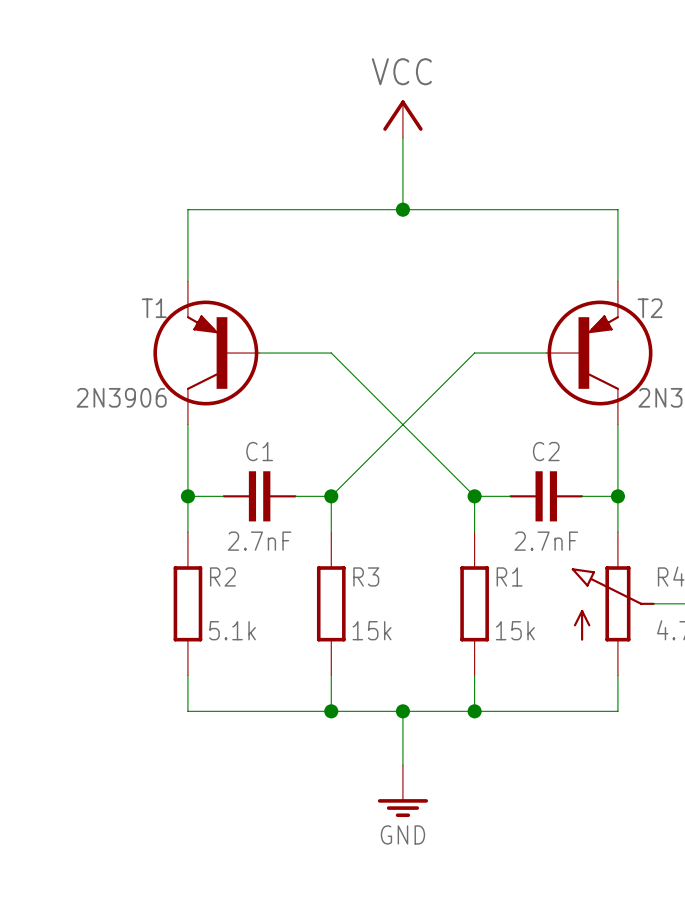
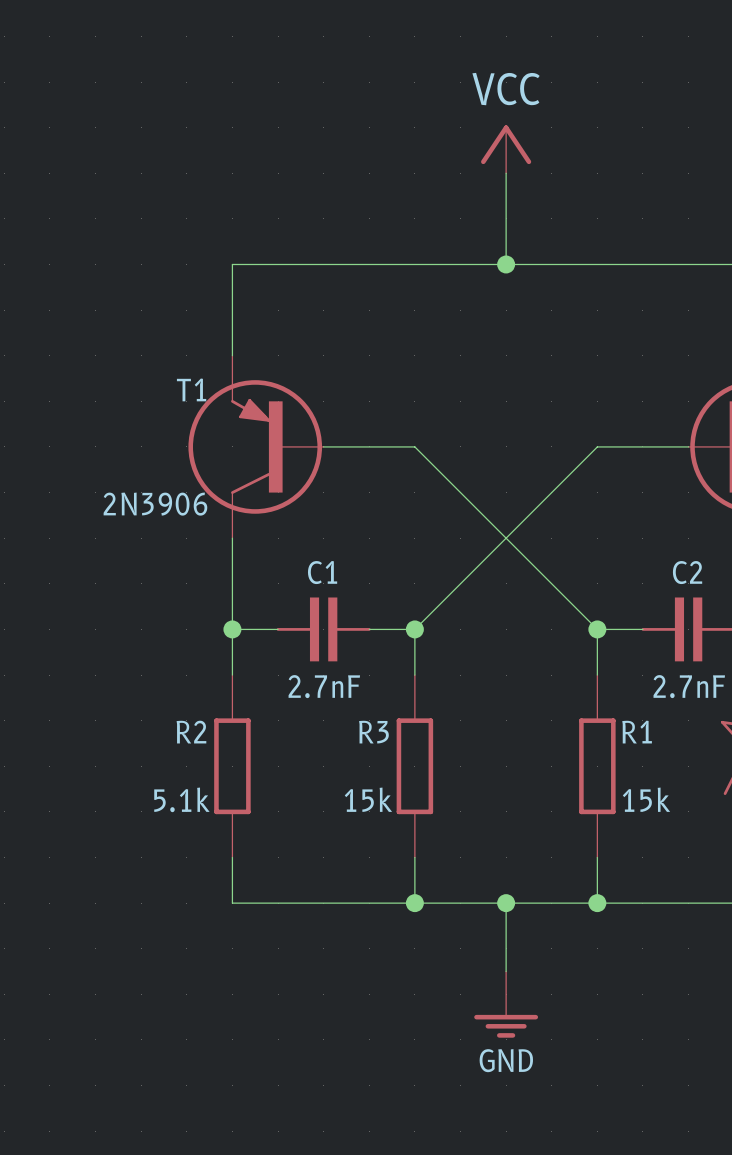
R2 name position: R2 (222, 576) -> R2 (191, 732)
R3 name position: R3 (366, 576) -> R3 (373, 732)
R2 value position: 5.1k (232, 630) -> 5.1k (181, 799)
R3 value position: 15k (372, 630) -> 15k (368, 799)

